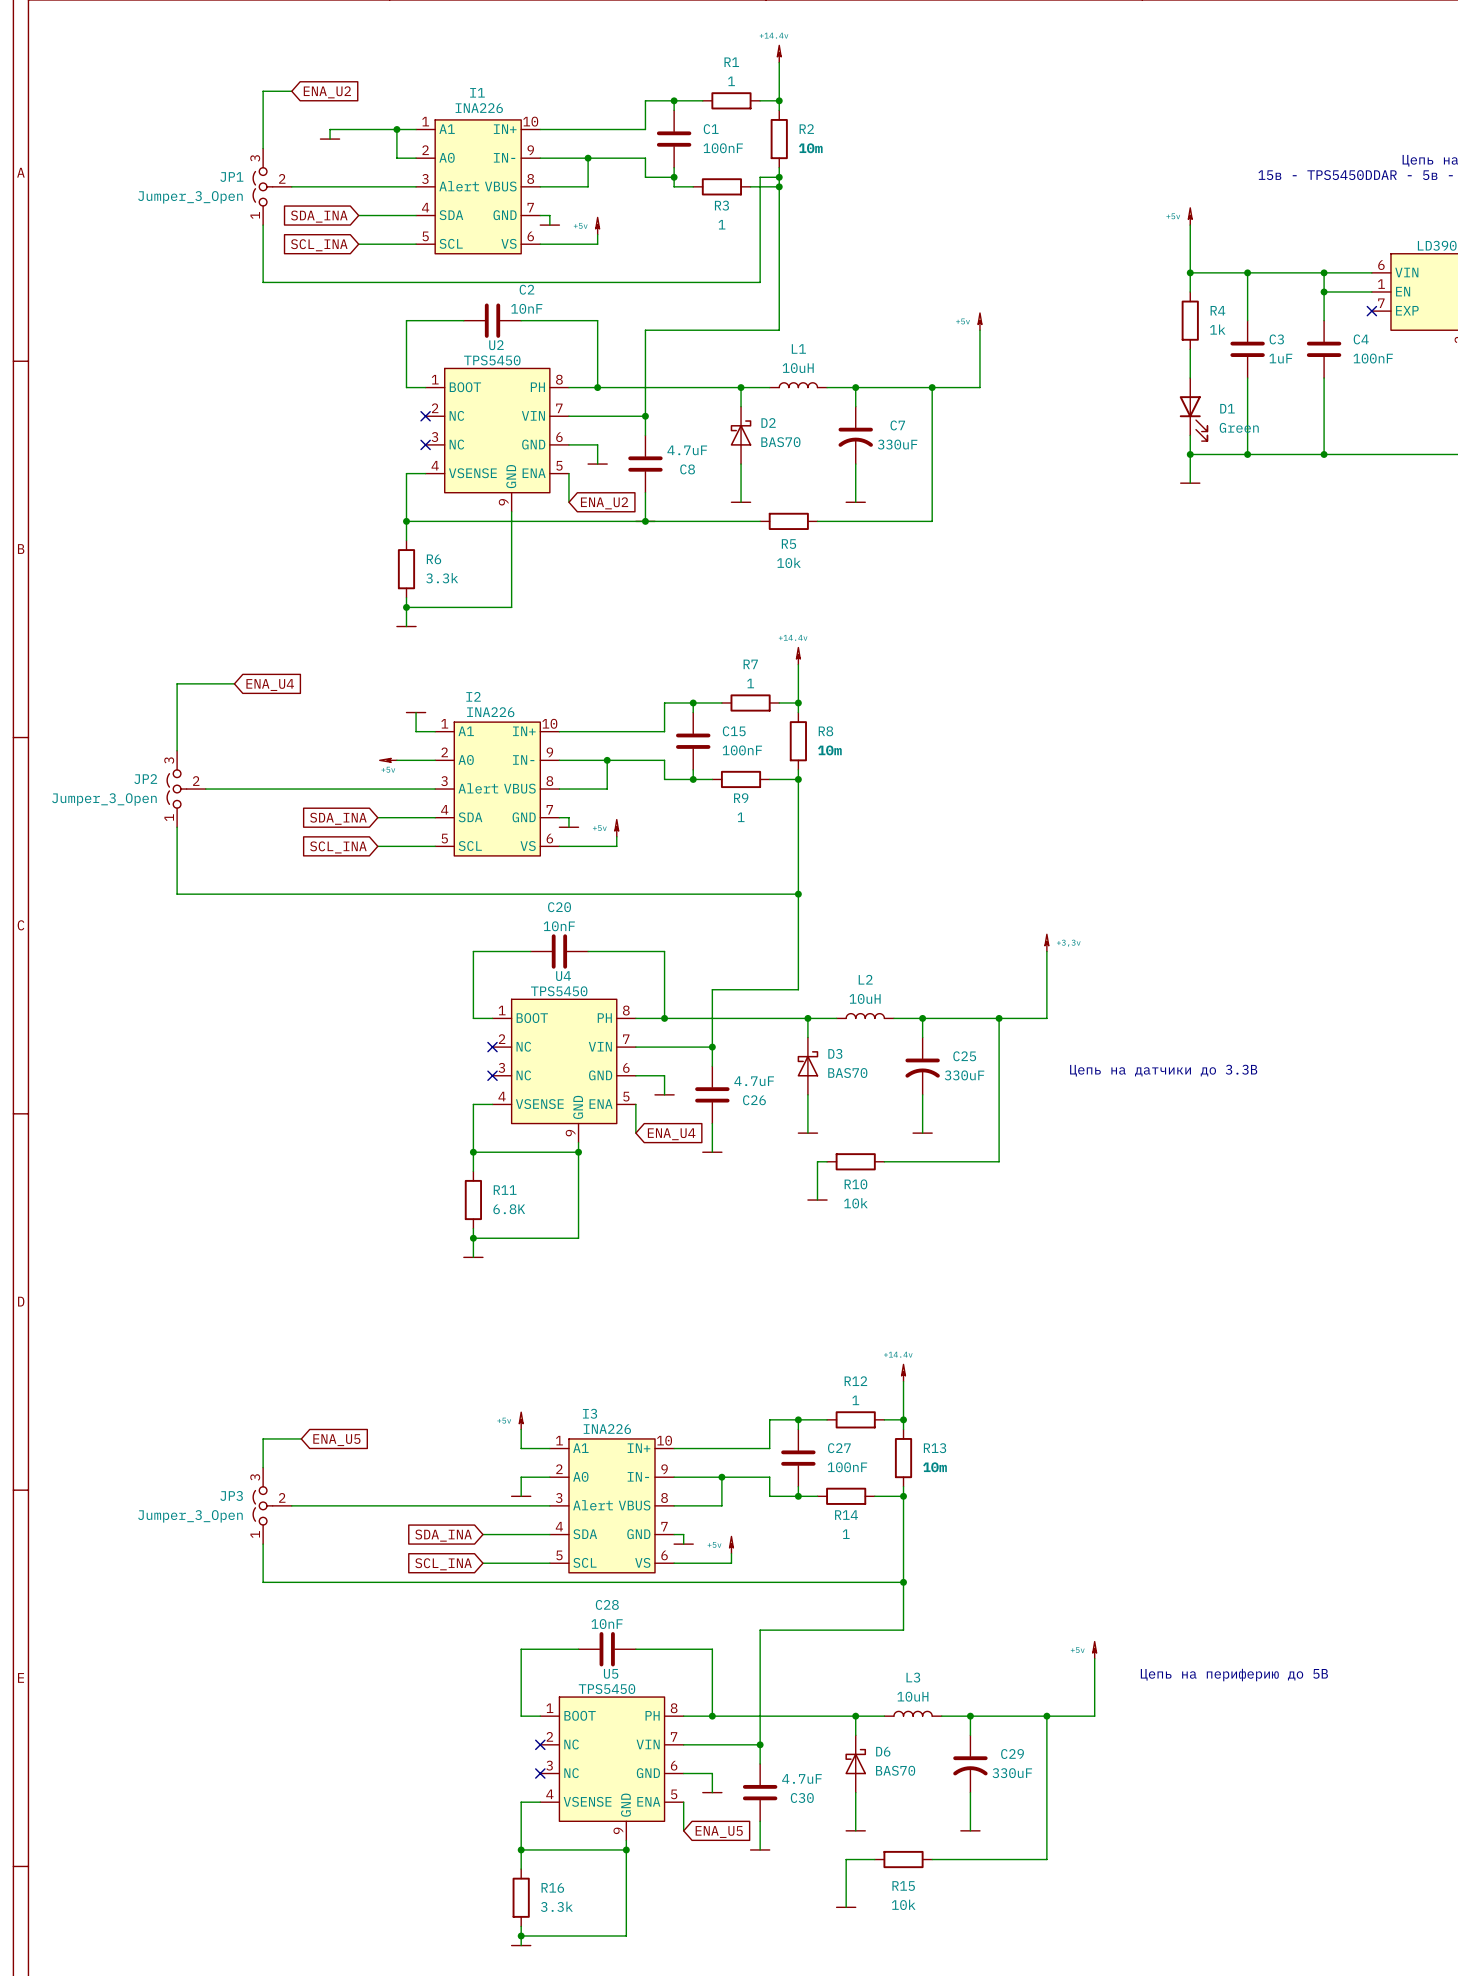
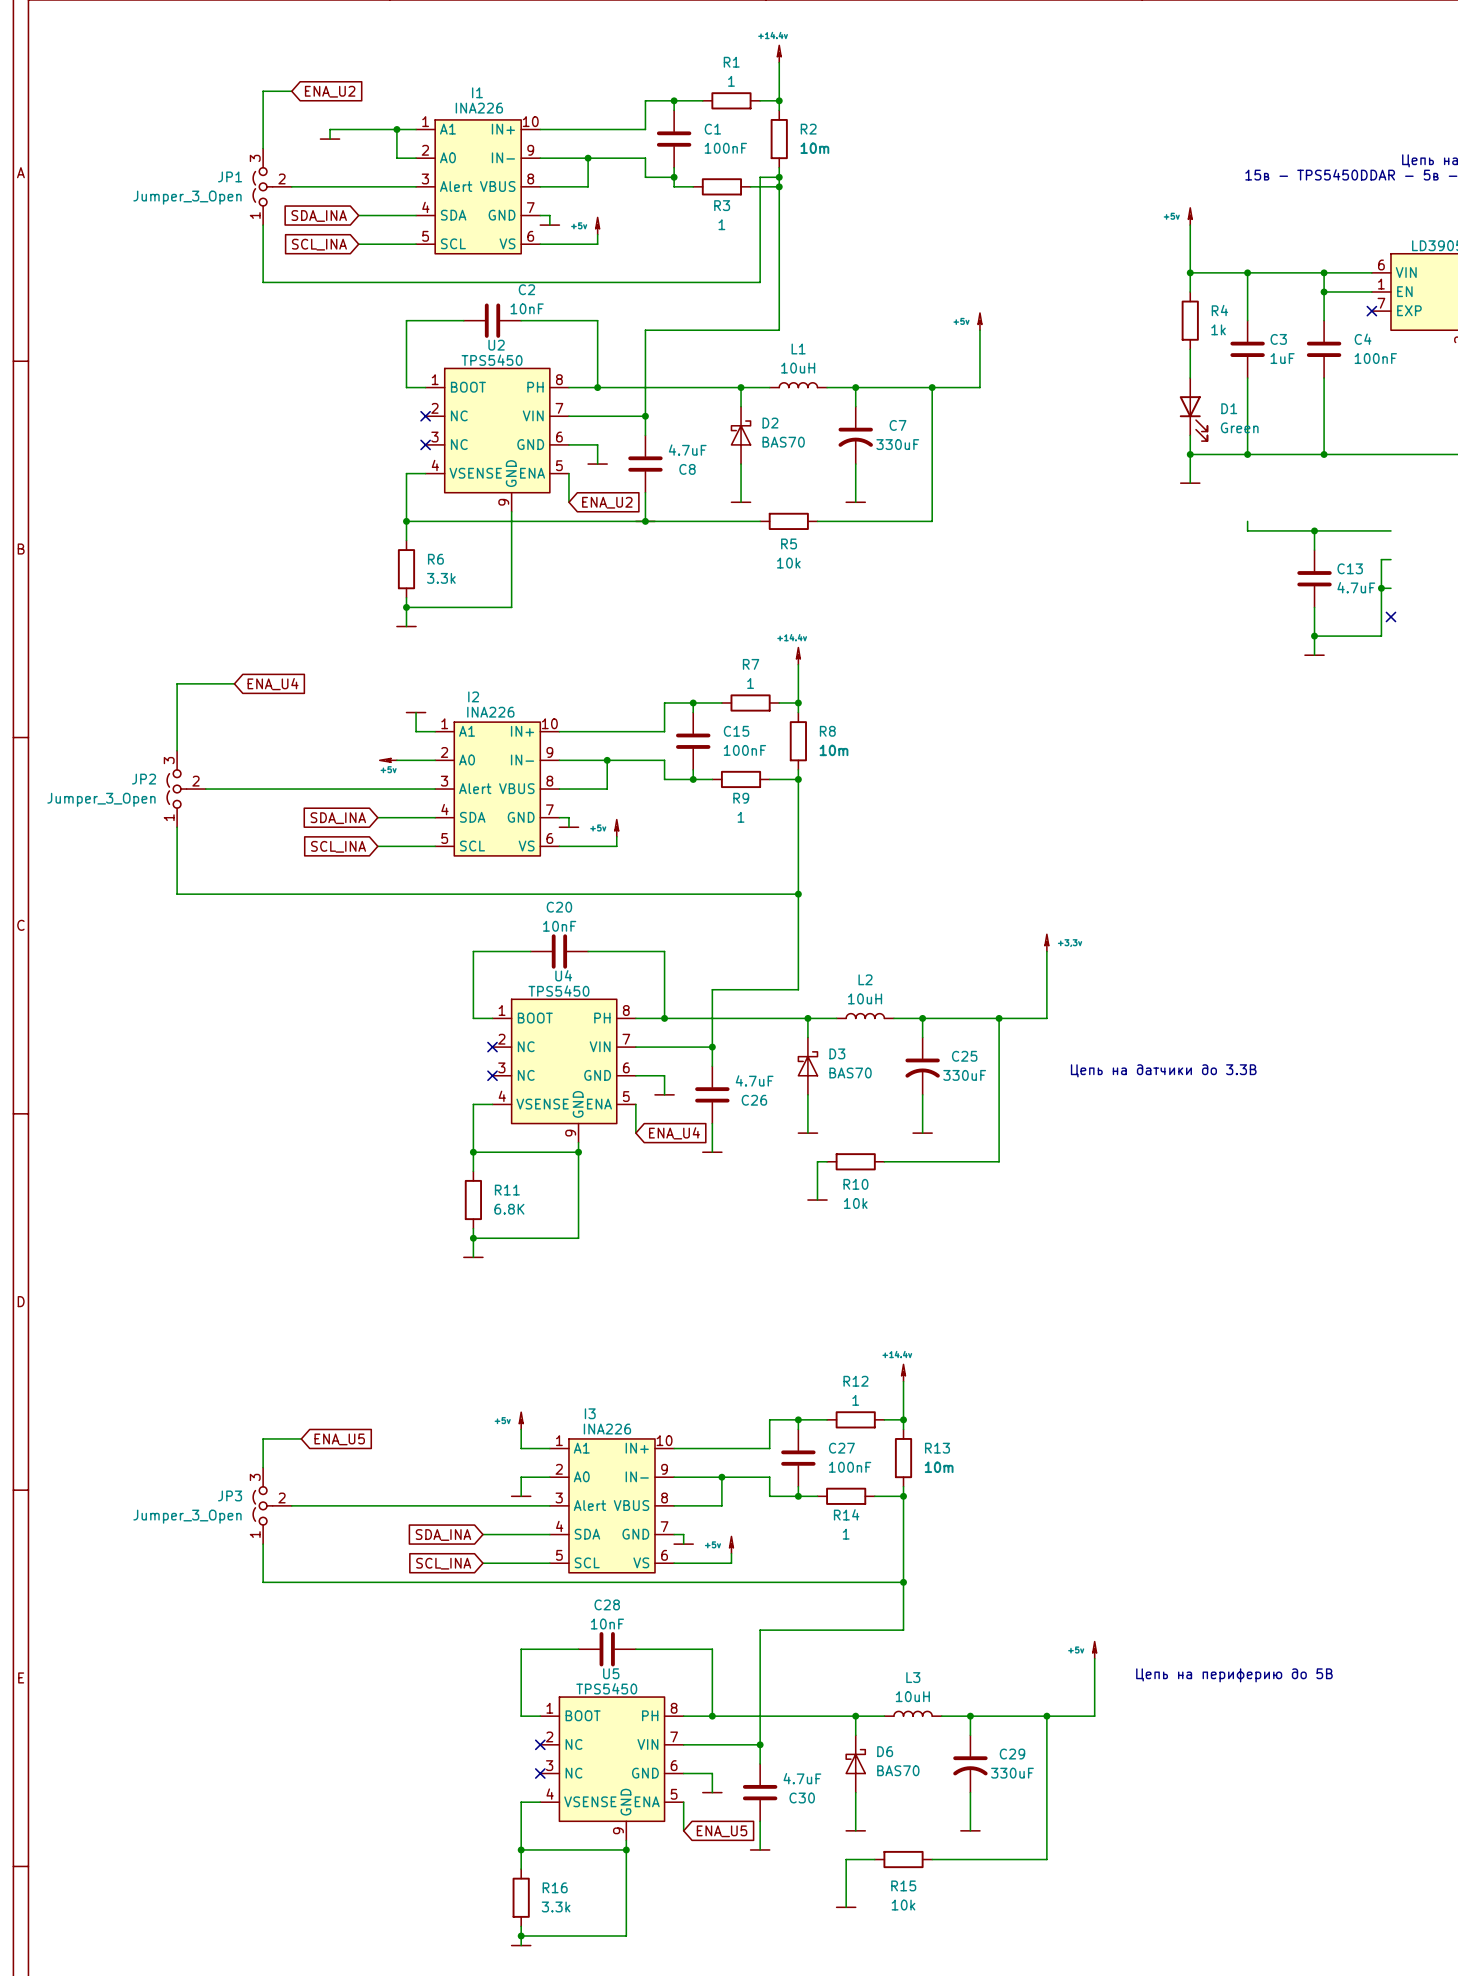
wire: none -> (1247, 521) (1247, 530) (1390, 530)
wire: none -> (1314, 530) (1314, 550)
junction: none -> (1314, 530)
wire: none -> (1390, 559) (1381, 559) (1381, 636) (1314, 636)
C13: none -> 4.7uF (1314, 578)
wire: none -> (1381, 588) (1390, 588)
junction: none -> (1381, 588)
wire: none -> (1314, 607) (1314, 655)
no-connect mark: none -> (1390, 616)
junction: none -> (1314, 636)
power symbol: none -> (1314, 655)

